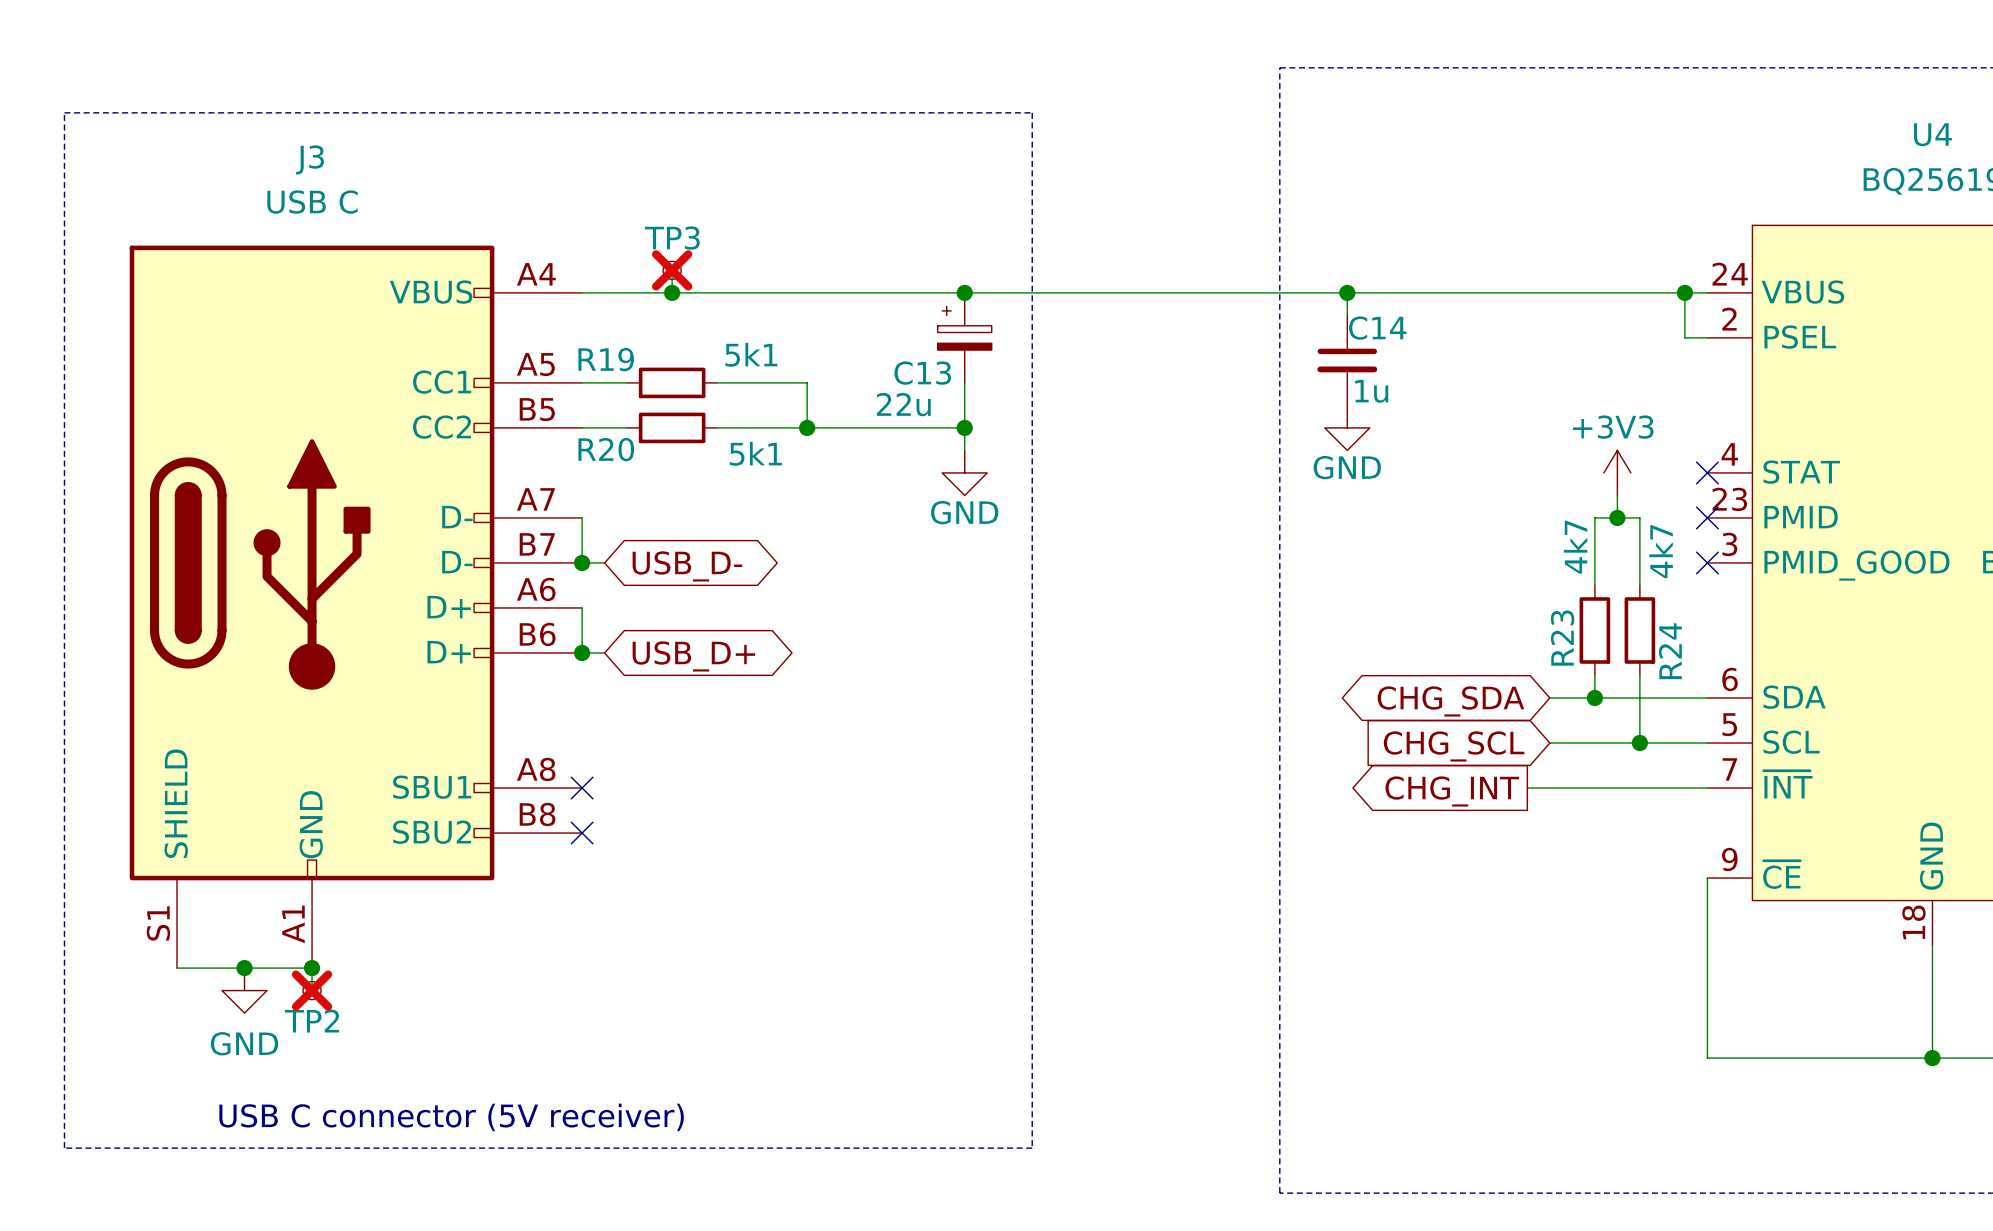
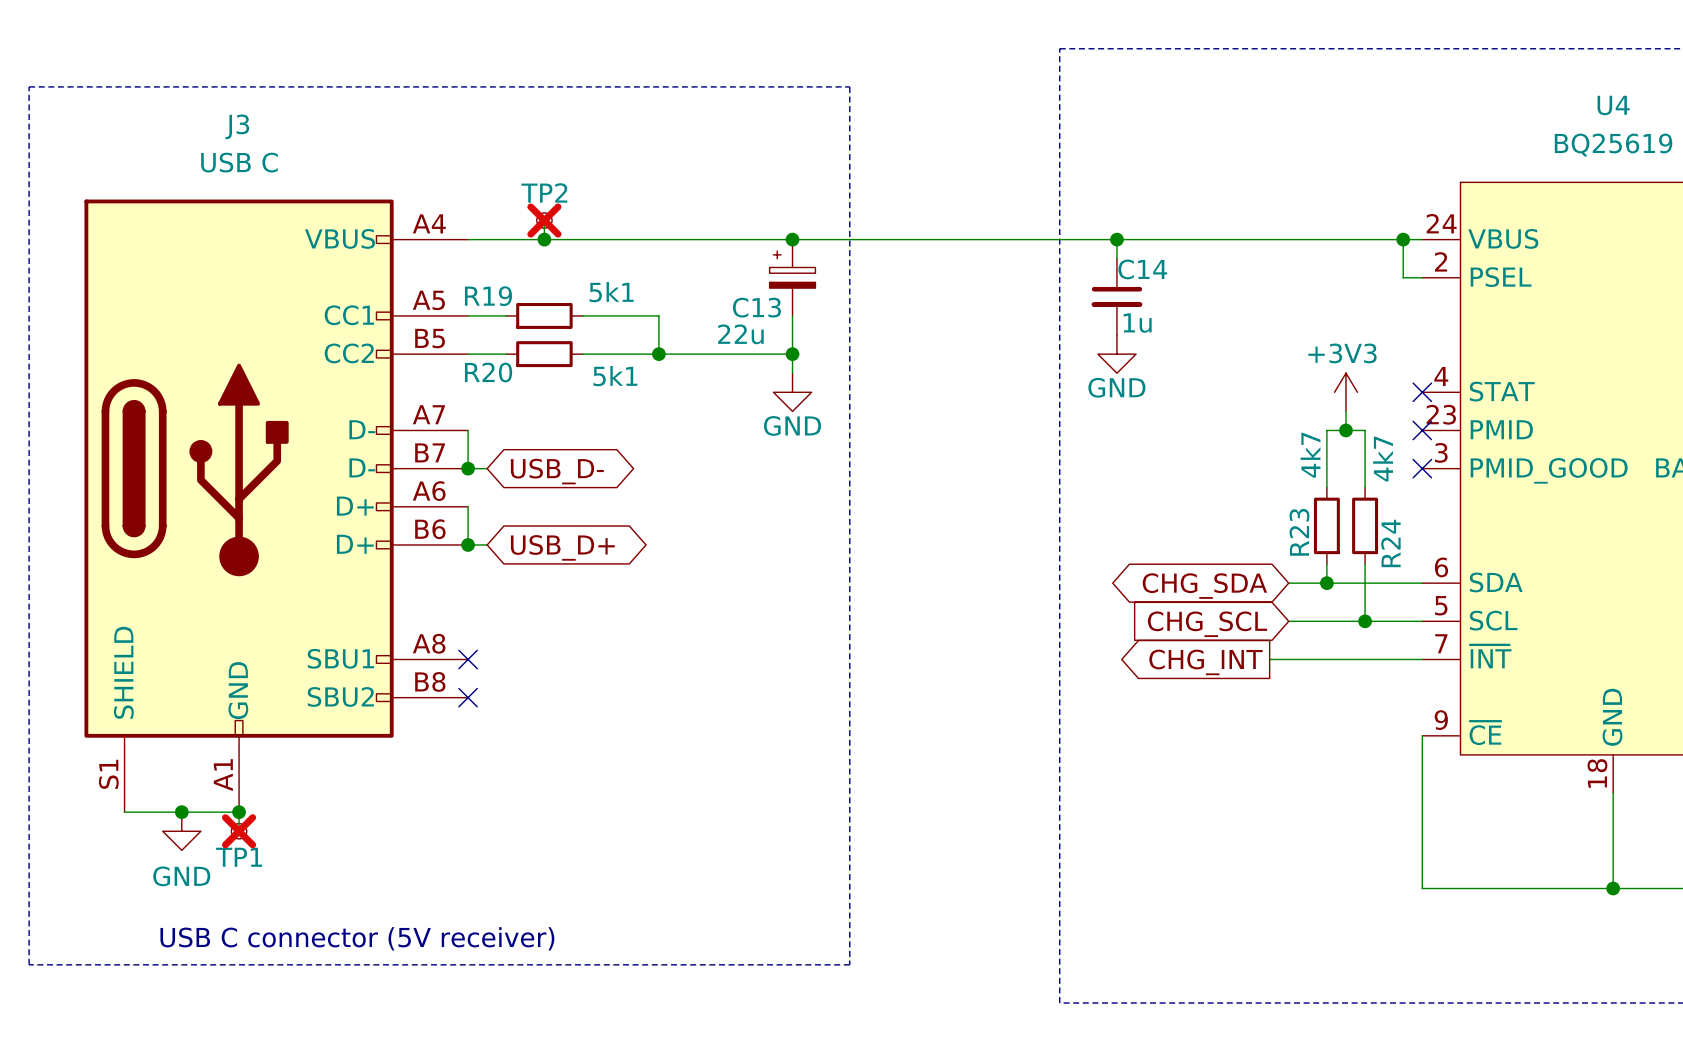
TP3 name: TP3 (672, 238) -> TP2 (544, 192)
TP2 name: TP2 (312, 1021) -> TP1 (239, 857)

